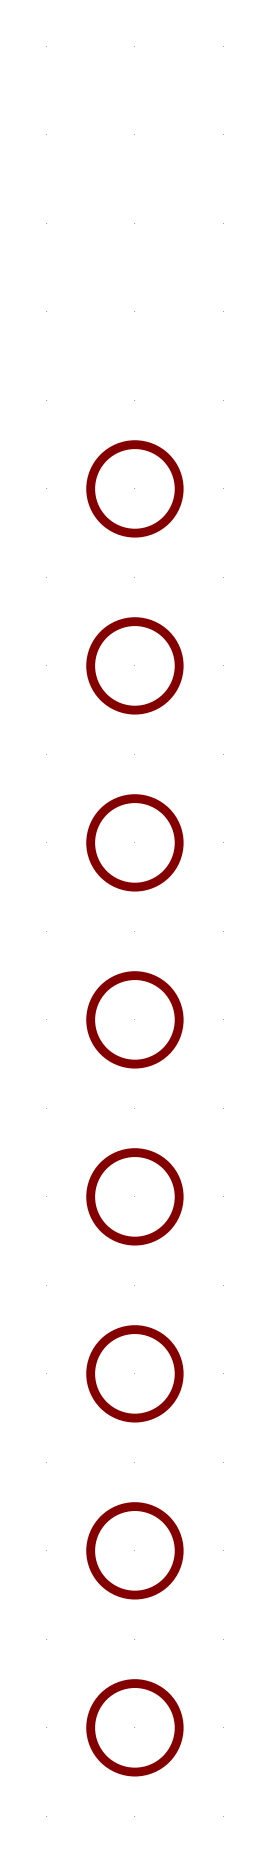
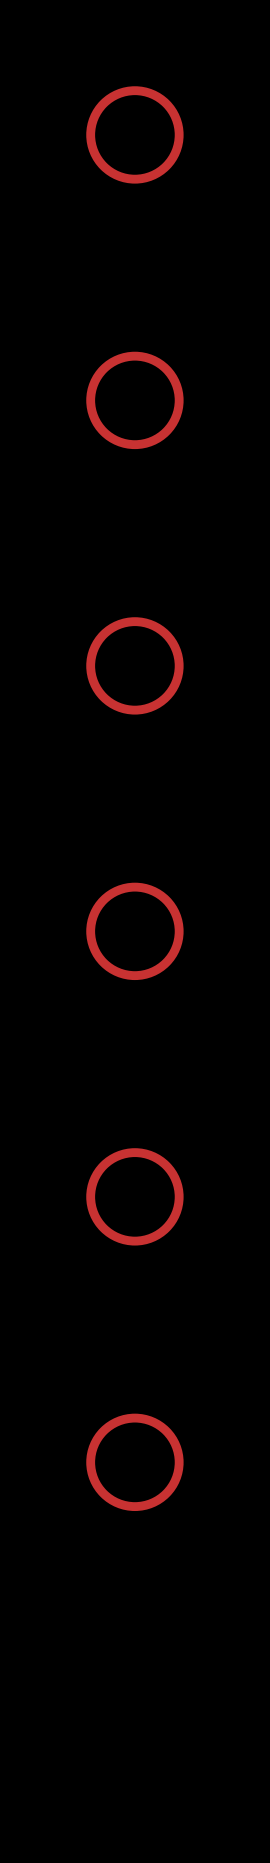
part: none -> (134, 134)
part position: (134, 488) -> (134, 400)
part: (134, 842) -> none
part: none -> (134, 931)
part: (134, 1019) -> none
part: (134, 1373) -> none
part: none -> (134, 1462)
part: (134, 1550) -> none
part: (134, 1727) -> none

